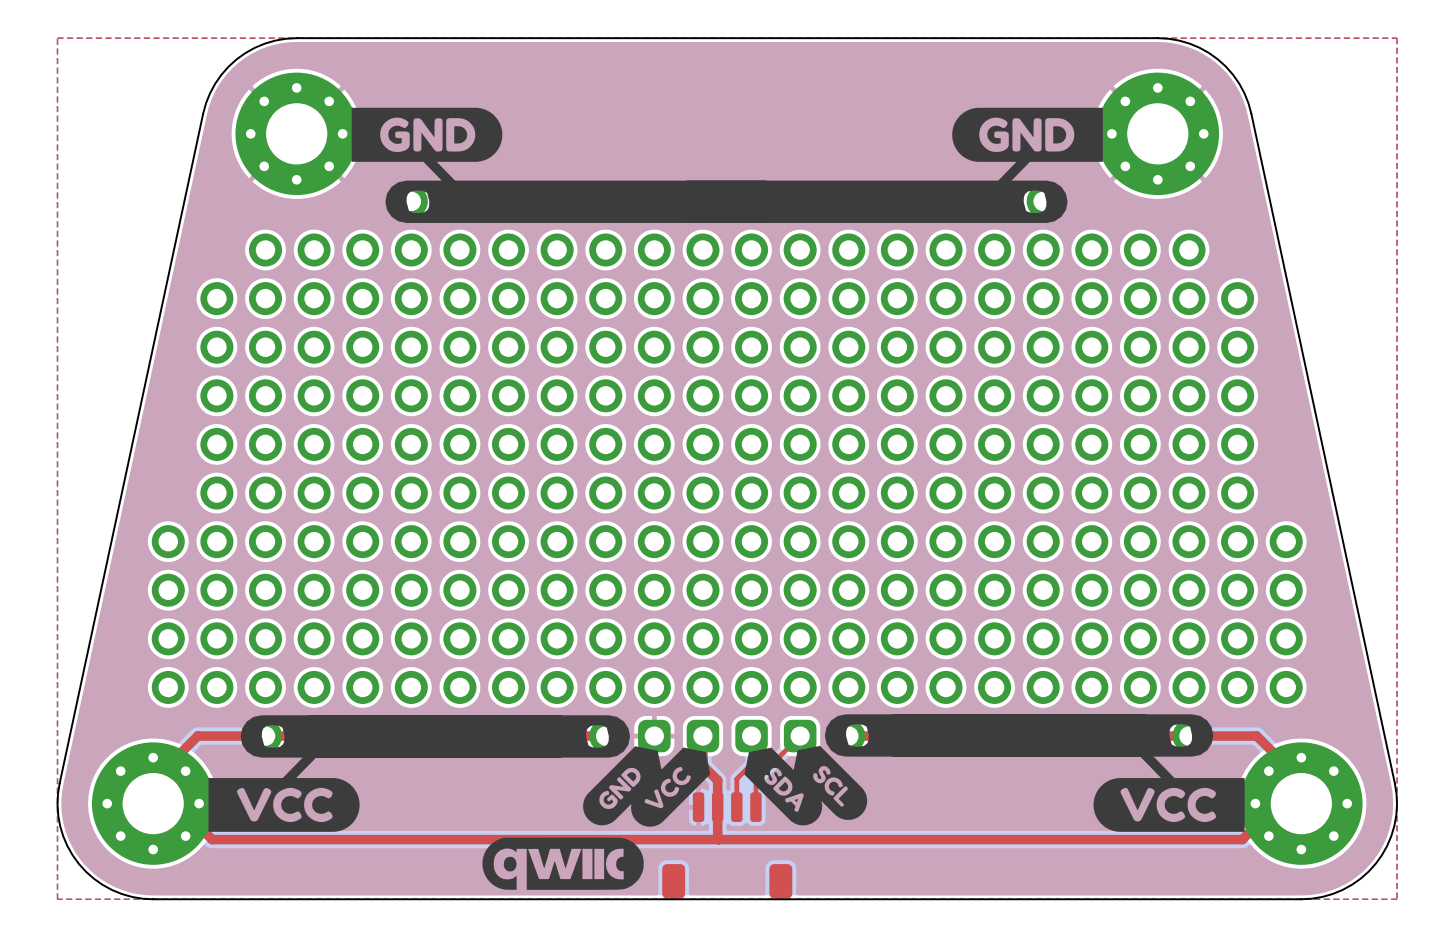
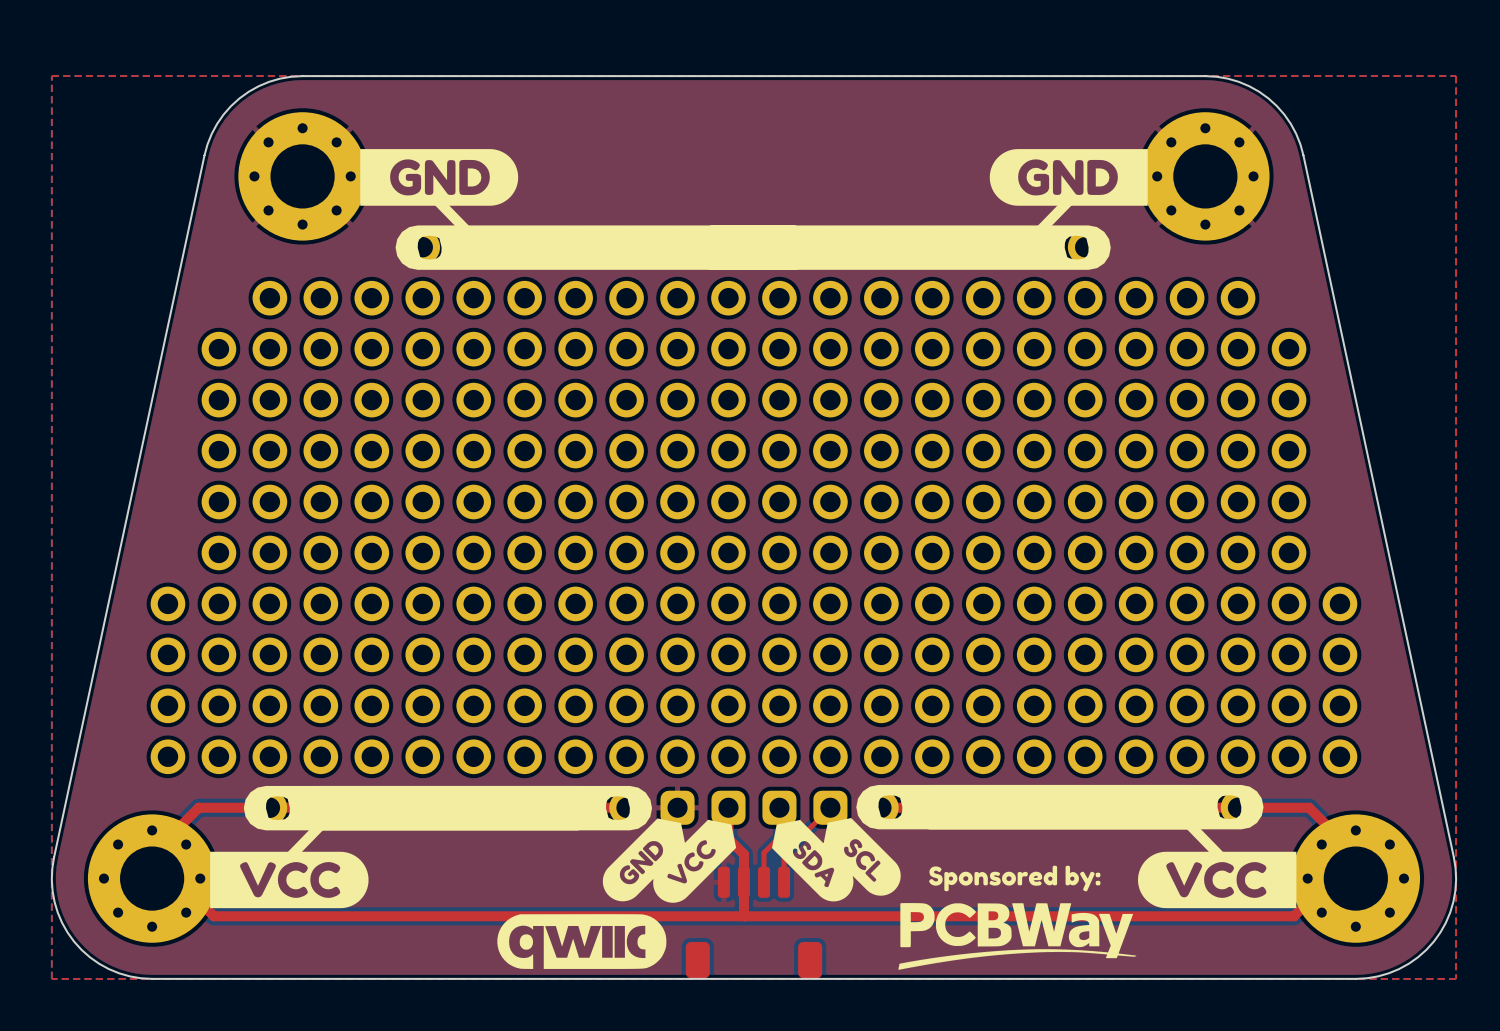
drawing: none -> [898, 865, 1137, 970]

